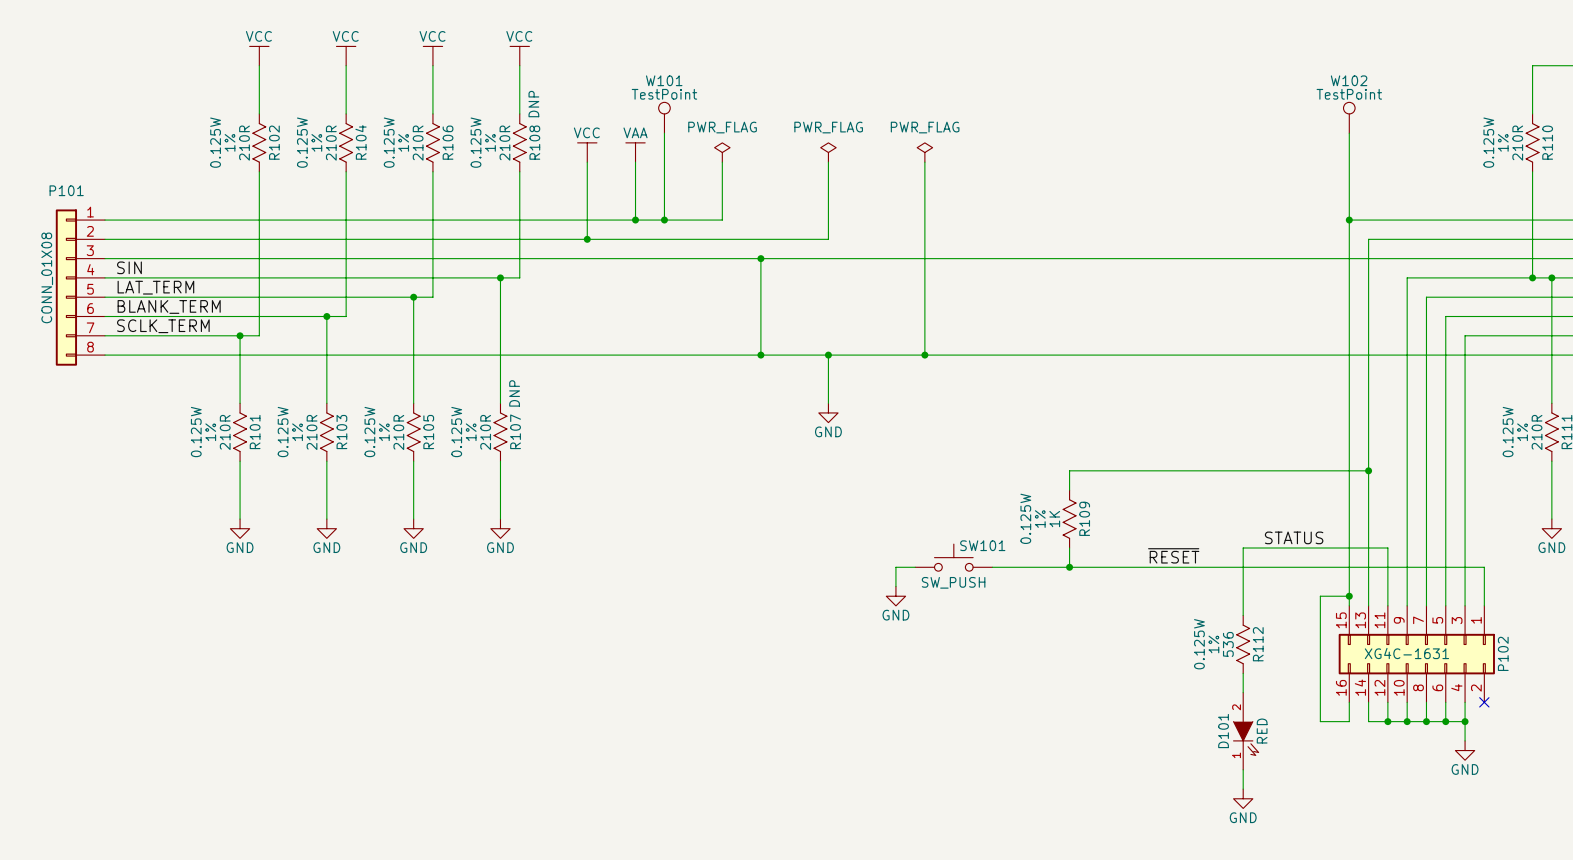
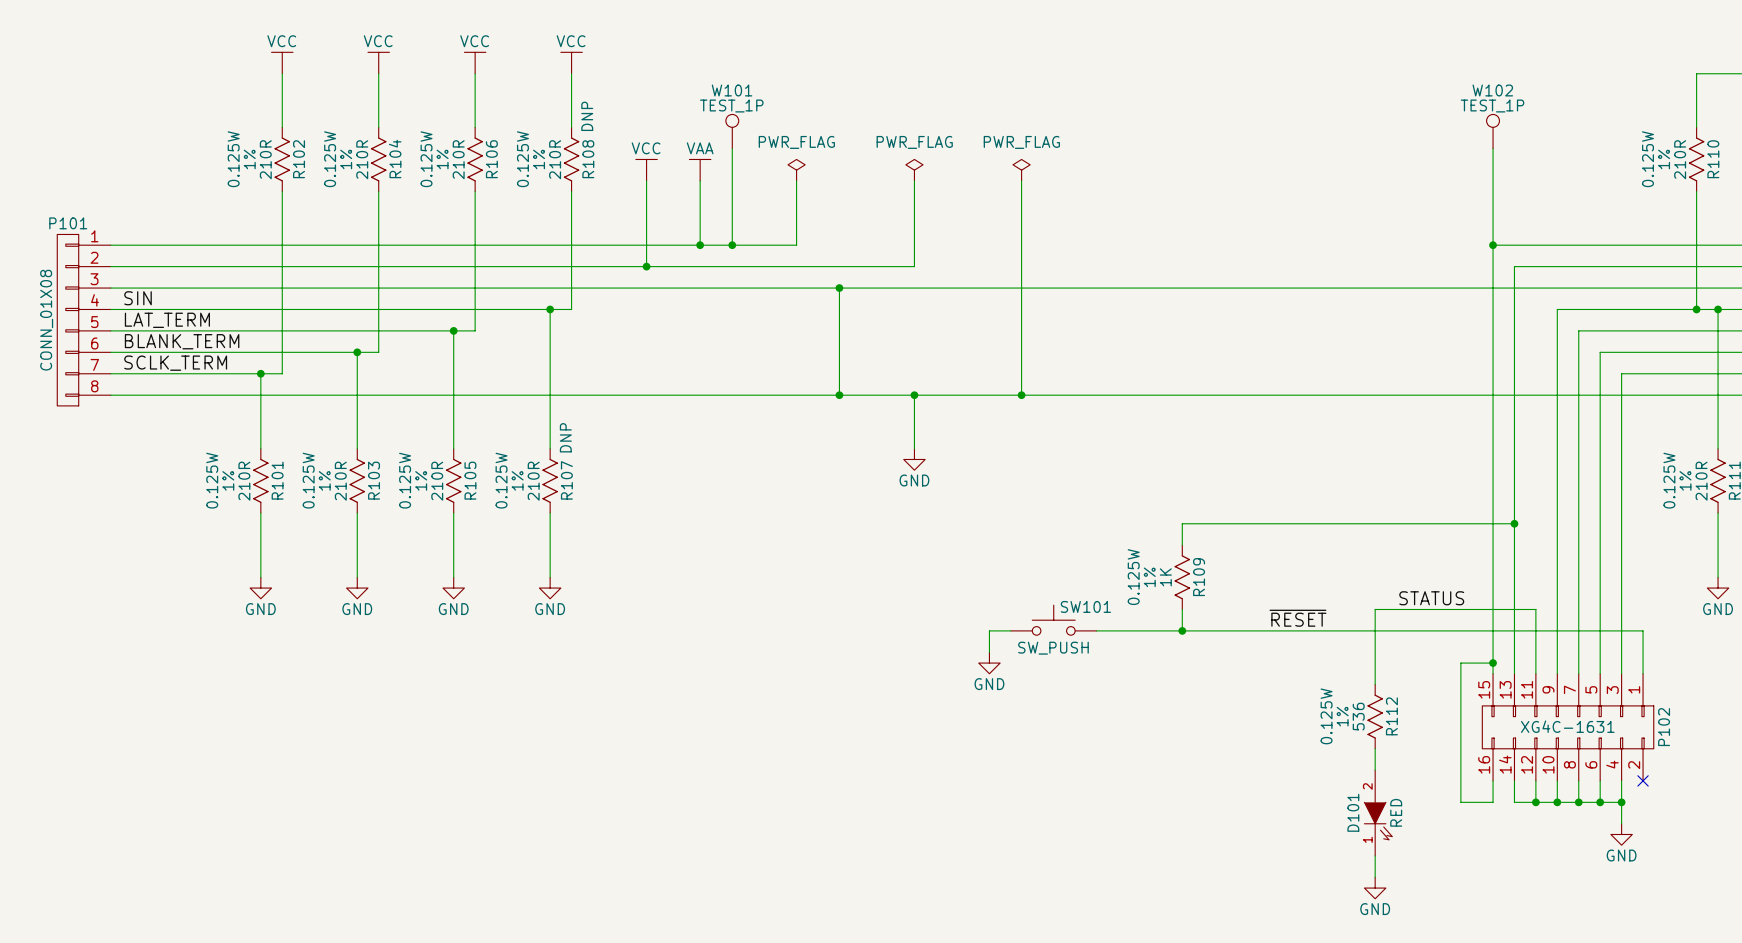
W101 value: TestPoint (664, 94) -> TEST_1P (731, 106)
W102 value: TestPoint (1349, 94) -> TEST_1P (1492, 106)
P101 symbol: [55, 209, 106, 366] -> [57, 234, 111, 406]
P102 symbol: [1338, 605, 1495, 703] -> [1482, 673, 1654, 781]

